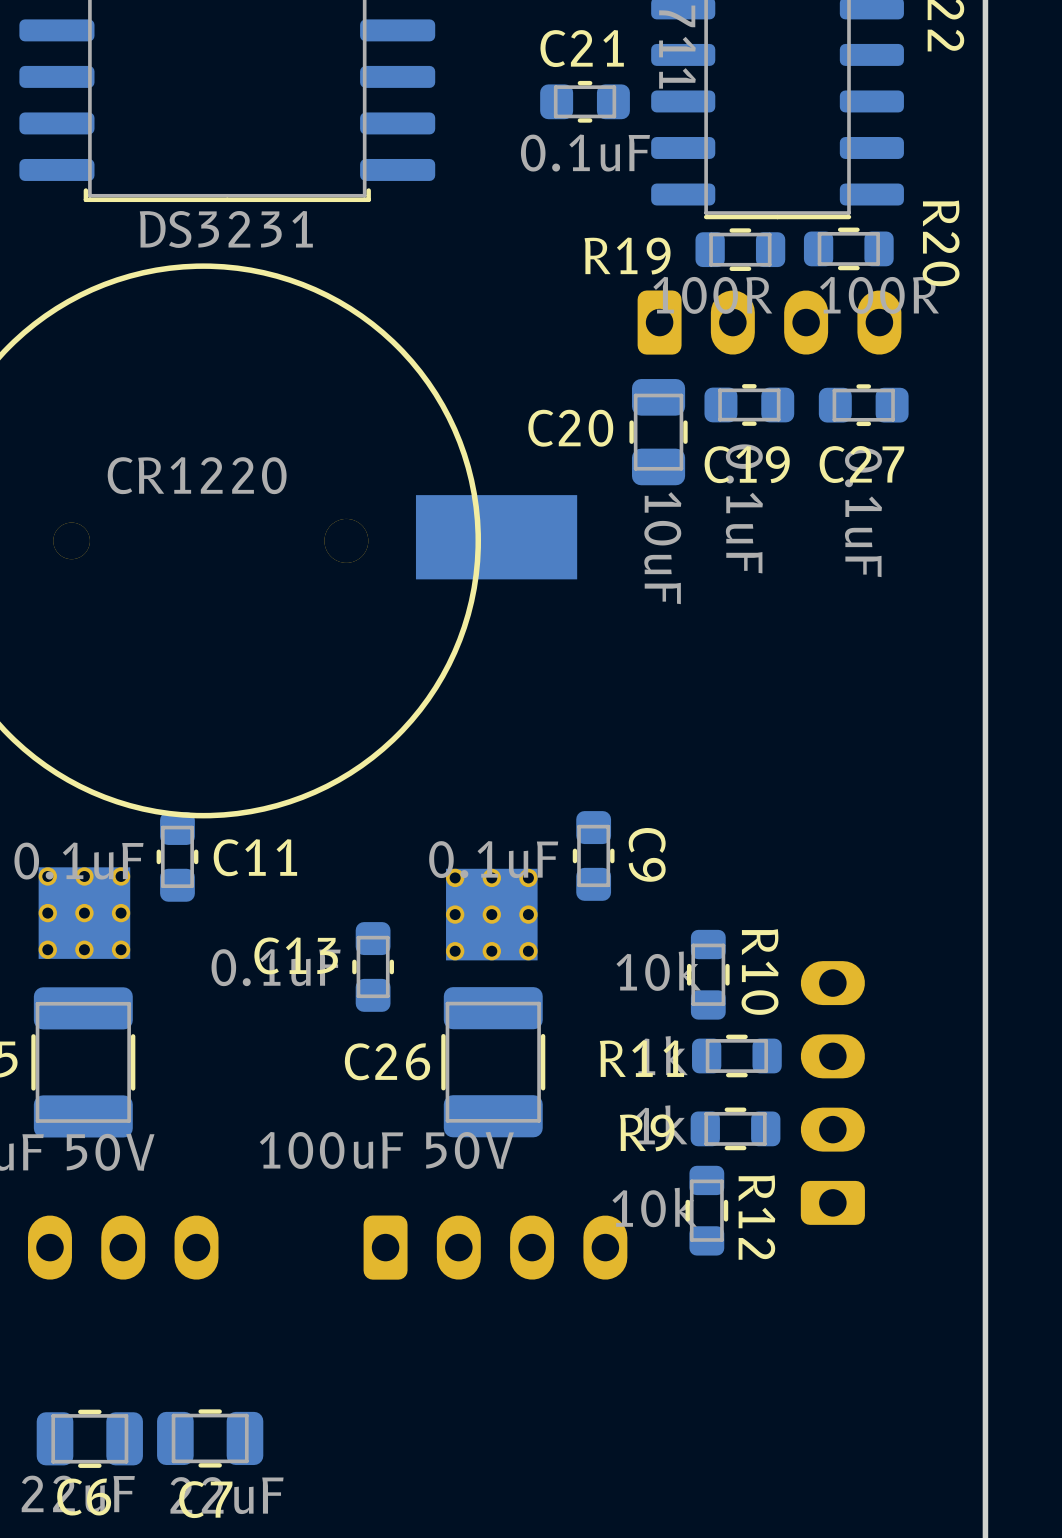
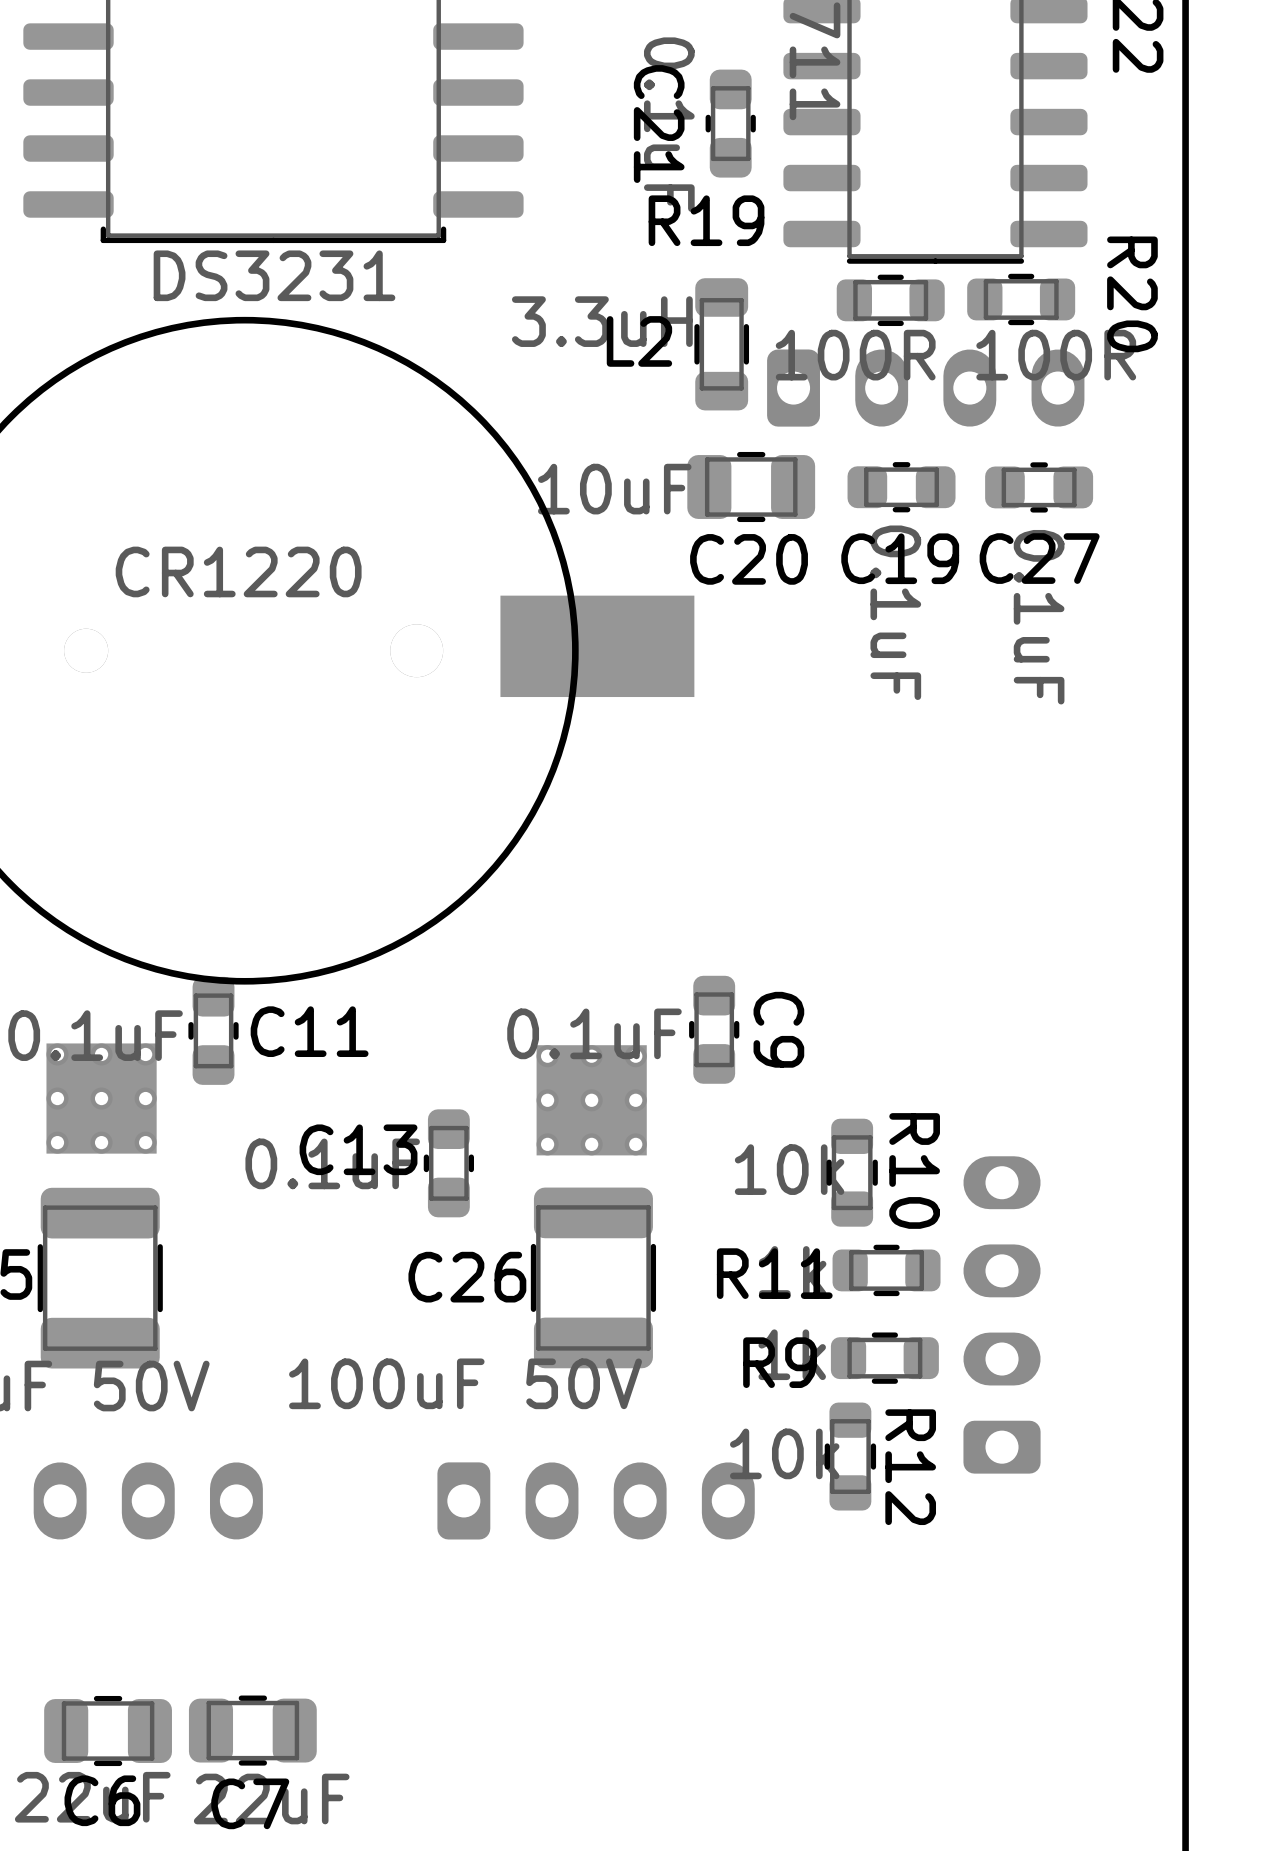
C21 name position: C21 (582, 48) -> C21 (659, 124)
C21 rotation: 0° (585, 101) -> 90° clockwise (730, 123)
R19 name position: R19 (627, 256) -> R19 (706, 220)
L2: none -> 3.3uH (721, 344)
C20 name position: C20 (570, 428) -> C20 (749, 559)
C20 rotation: 0° (658, 432) -> 90° clockwise (751, 487)

